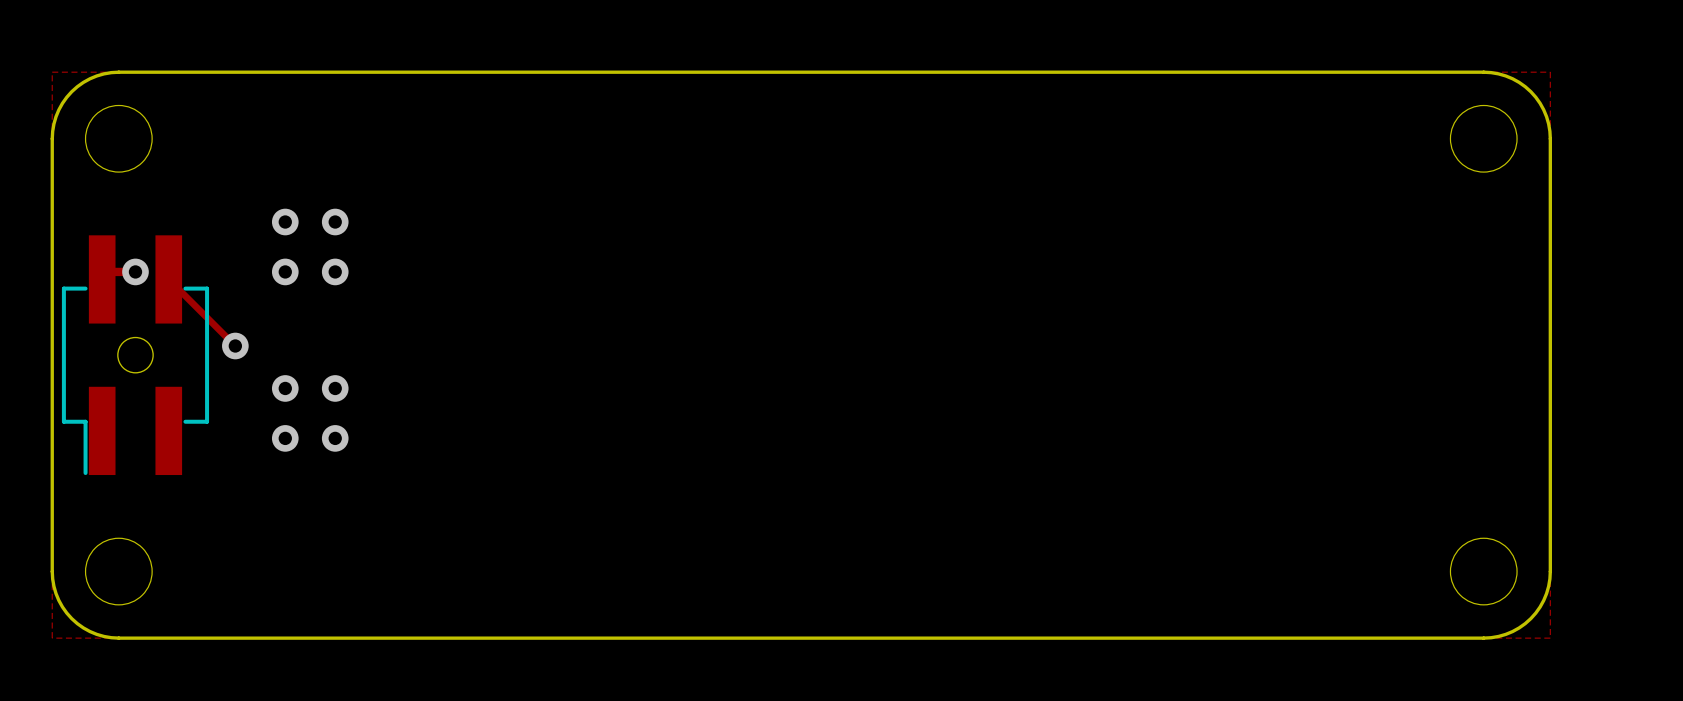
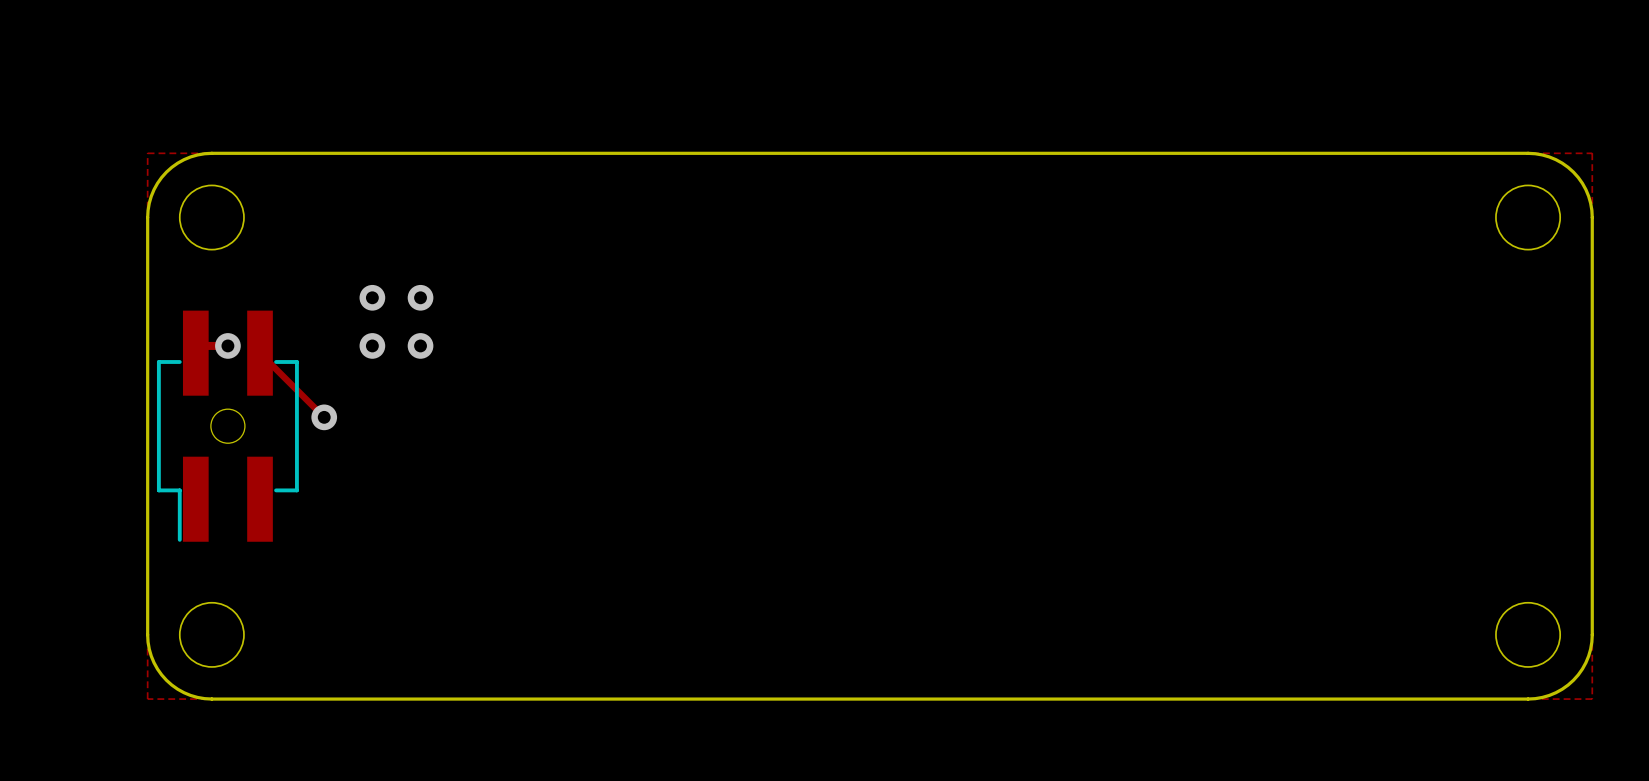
via: (285, 388) -> none
via: (335, 388) -> none
via: (285, 438) -> none
via: (335, 438) -> none

